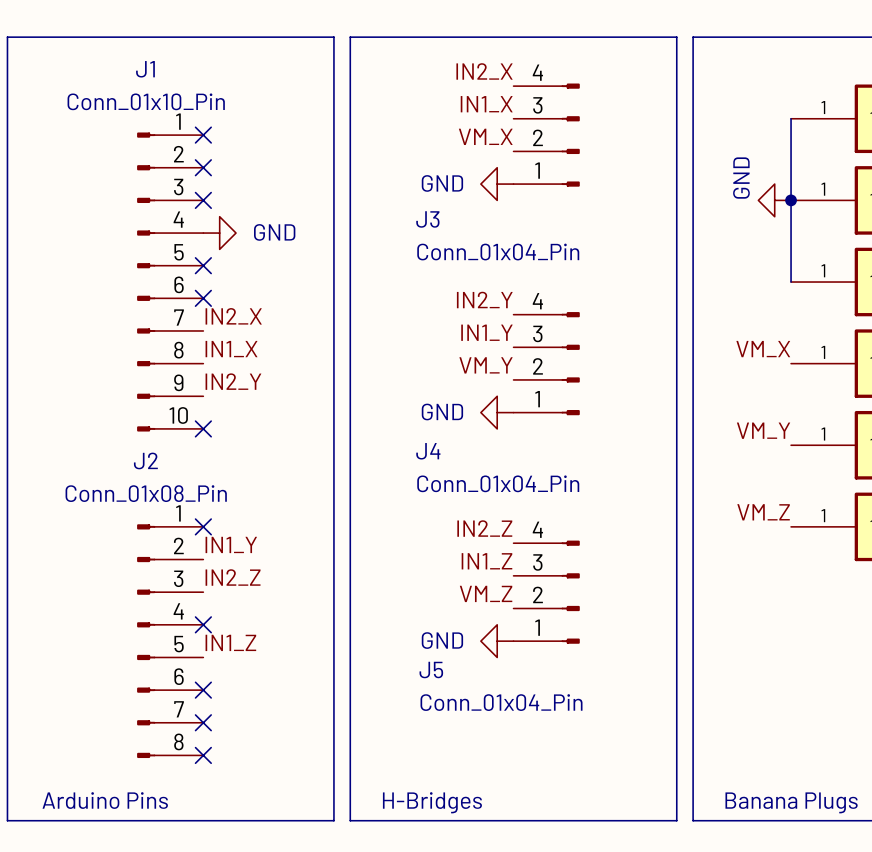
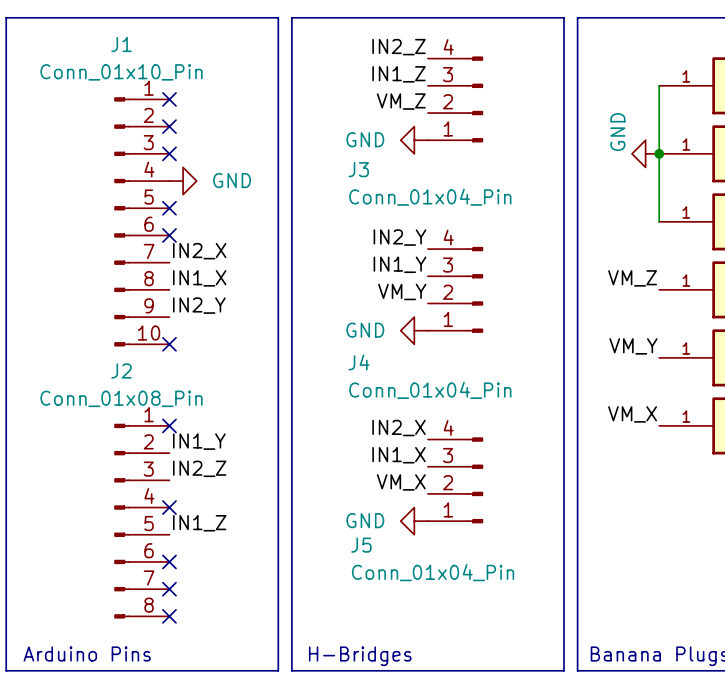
label: IN2_X (484, 71) -> IN2_Z (399, 47)
label: IN1_X (486, 104) -> IN1_Z (399, 74)
label: VM_X (485, 136) -> VM_Z (401, 101)
label: VM_X (763, 349) -> VM_Z (632, 278)
label: VM_Z (763, 512) -> VM_X (632, 414)
label: IN2_Z (484, 528) -> IN2_X (399, 428)
label: IN1_Z (486, 561) -> IN1_X (399, 455)
label: VM_Z (486, 593) -> VM_X (401, 482)

